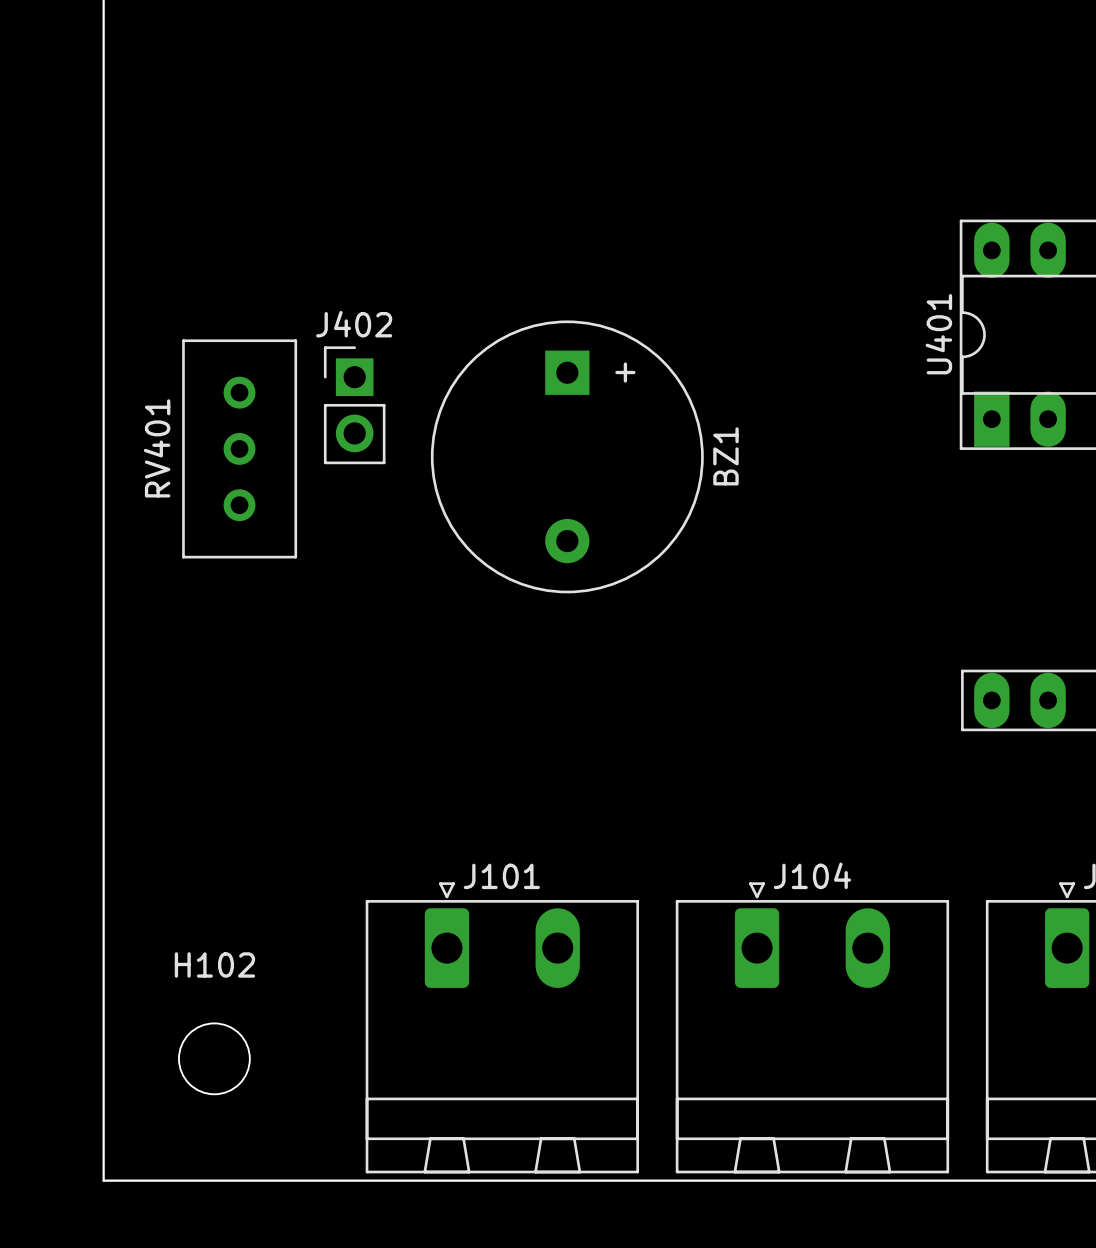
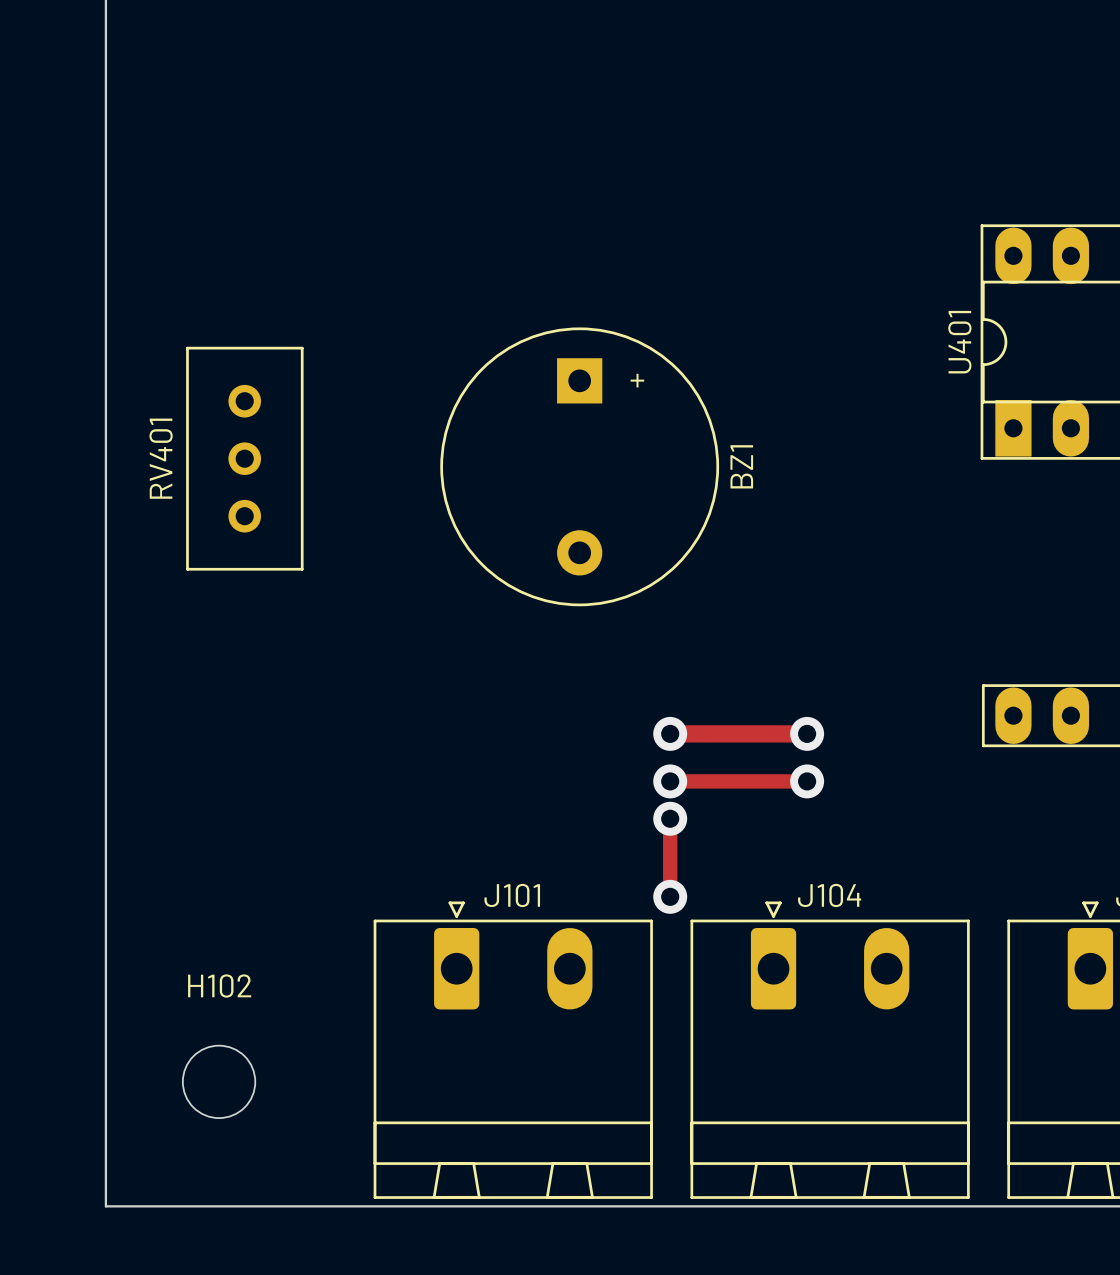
J402: (354, 405) -> none
track: none -> (670, 733) (807, 733)
via: none -> (670, 733)
via: none -> (807, 733)
track: none -> (670, 781) (807, 781)
via: none -> (670, 781)
via: none -> (807, 781)
track: none -> (670, 818) (670, 896)
via: none -> (670, 818)
via: none -> (670, 896)

